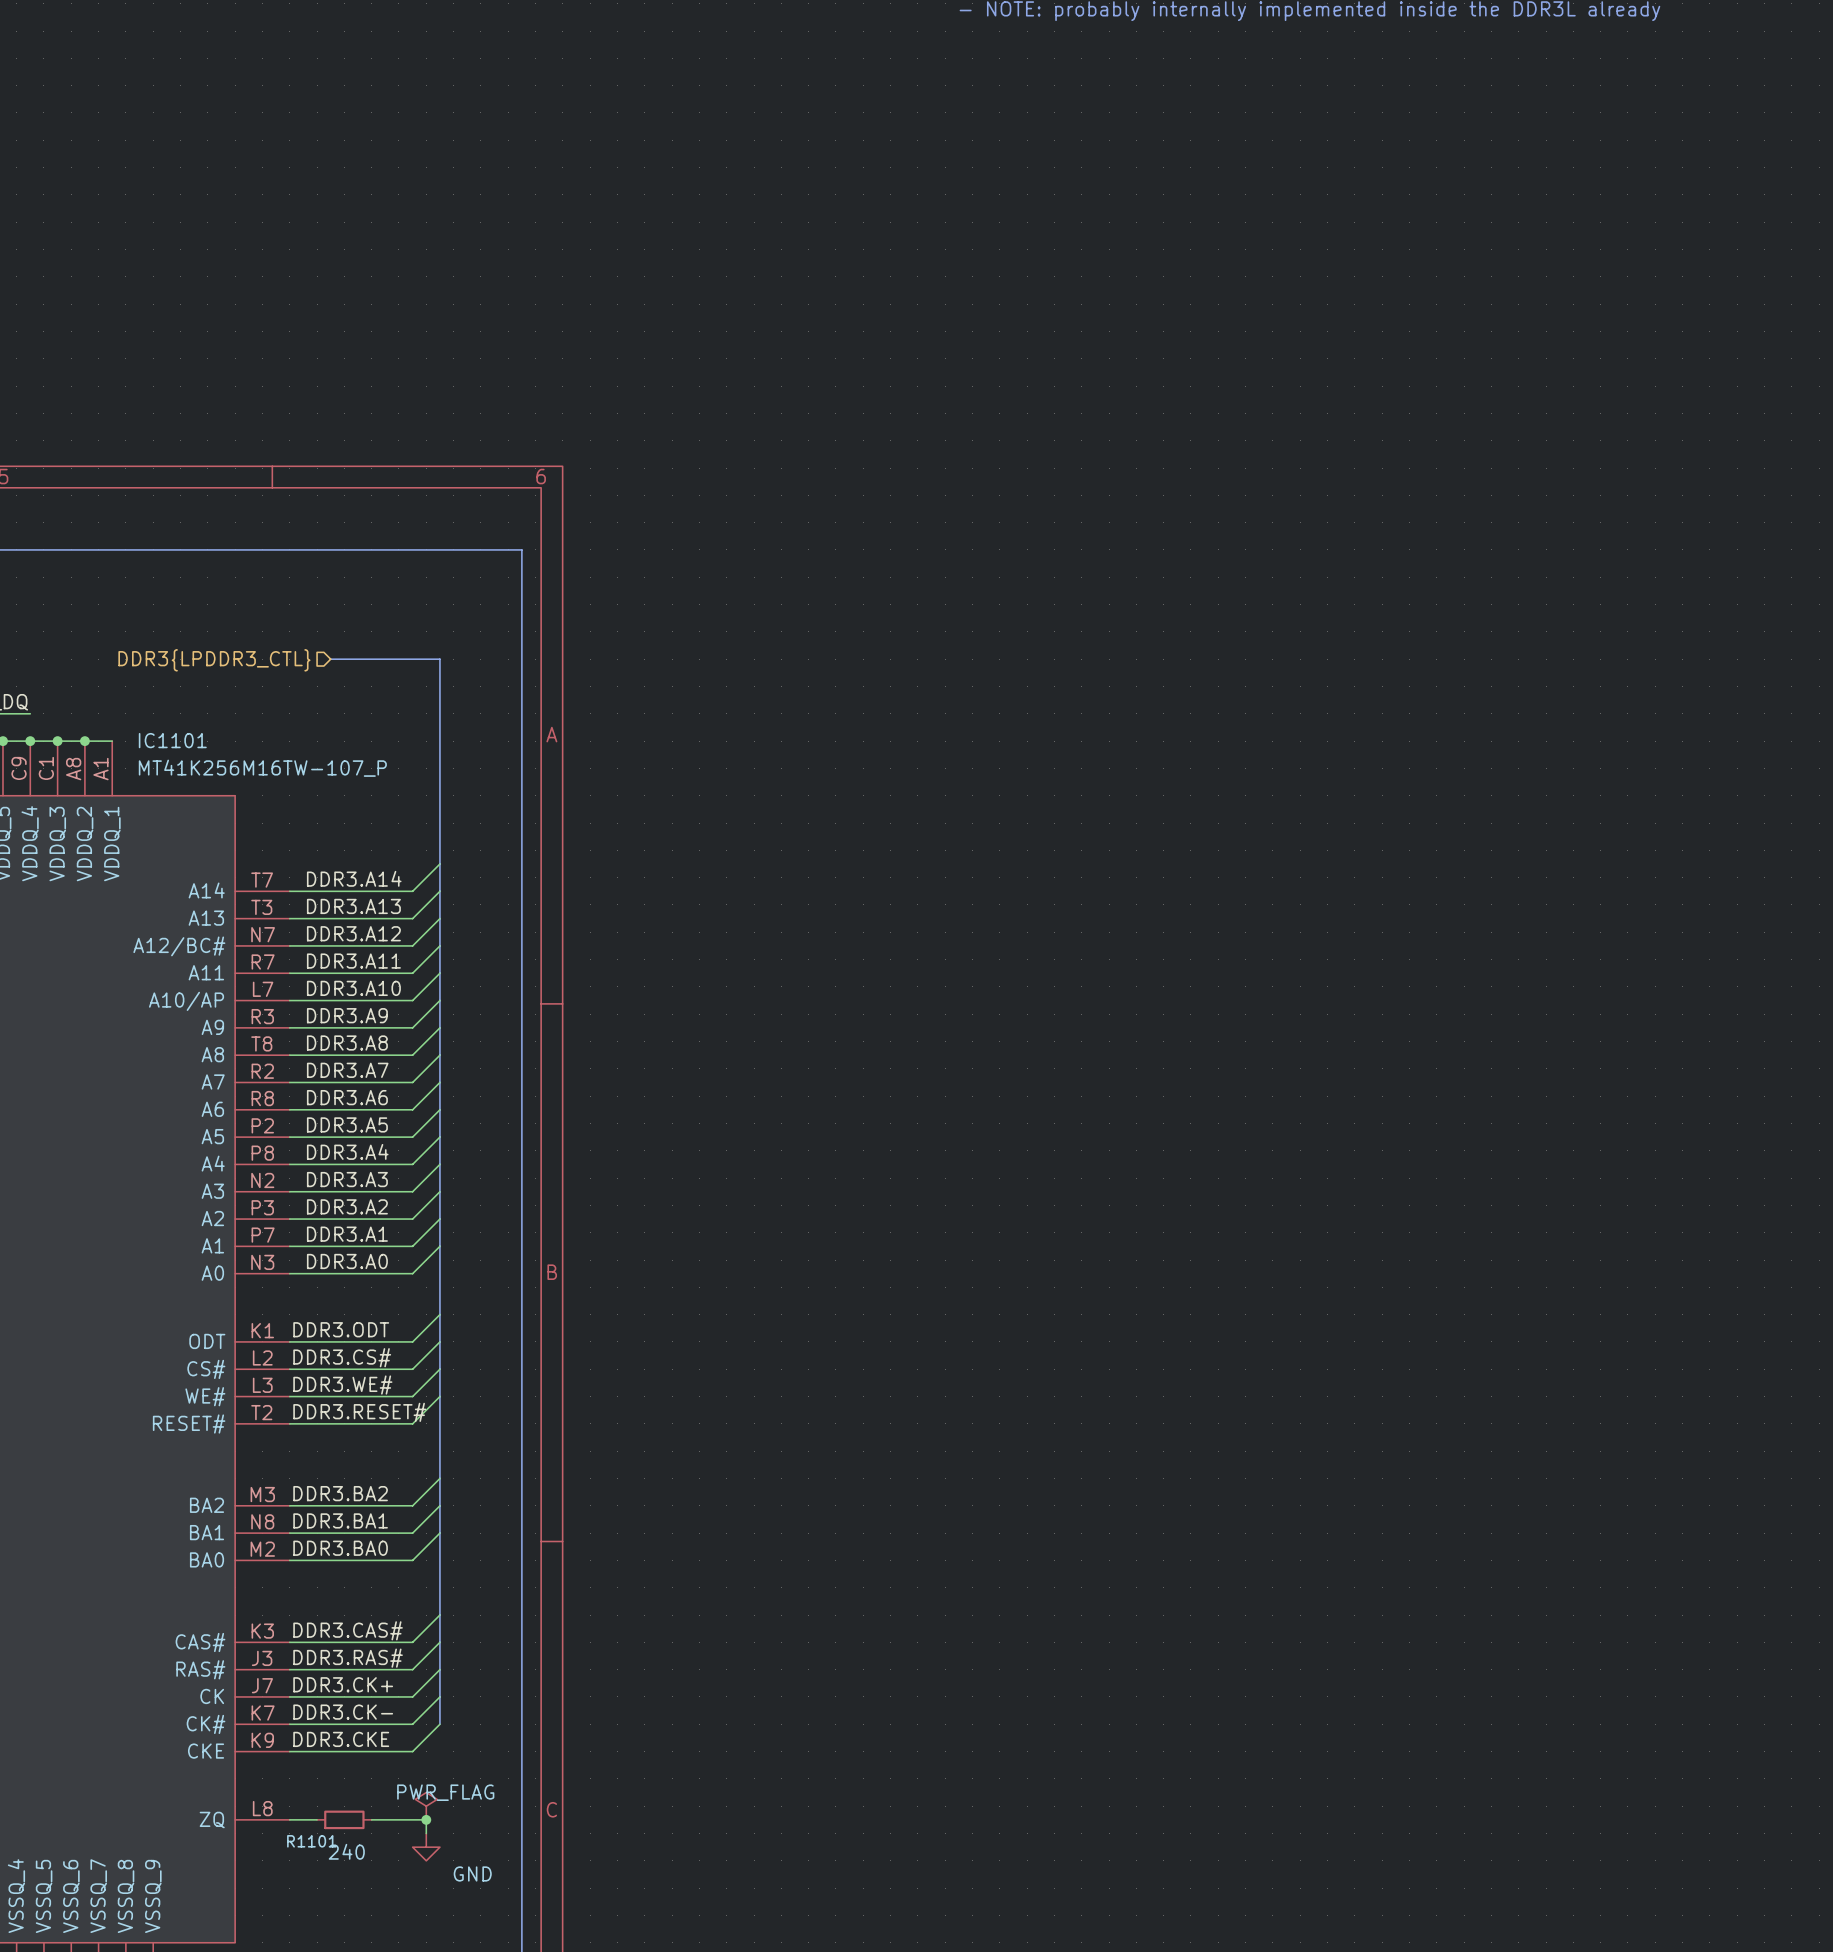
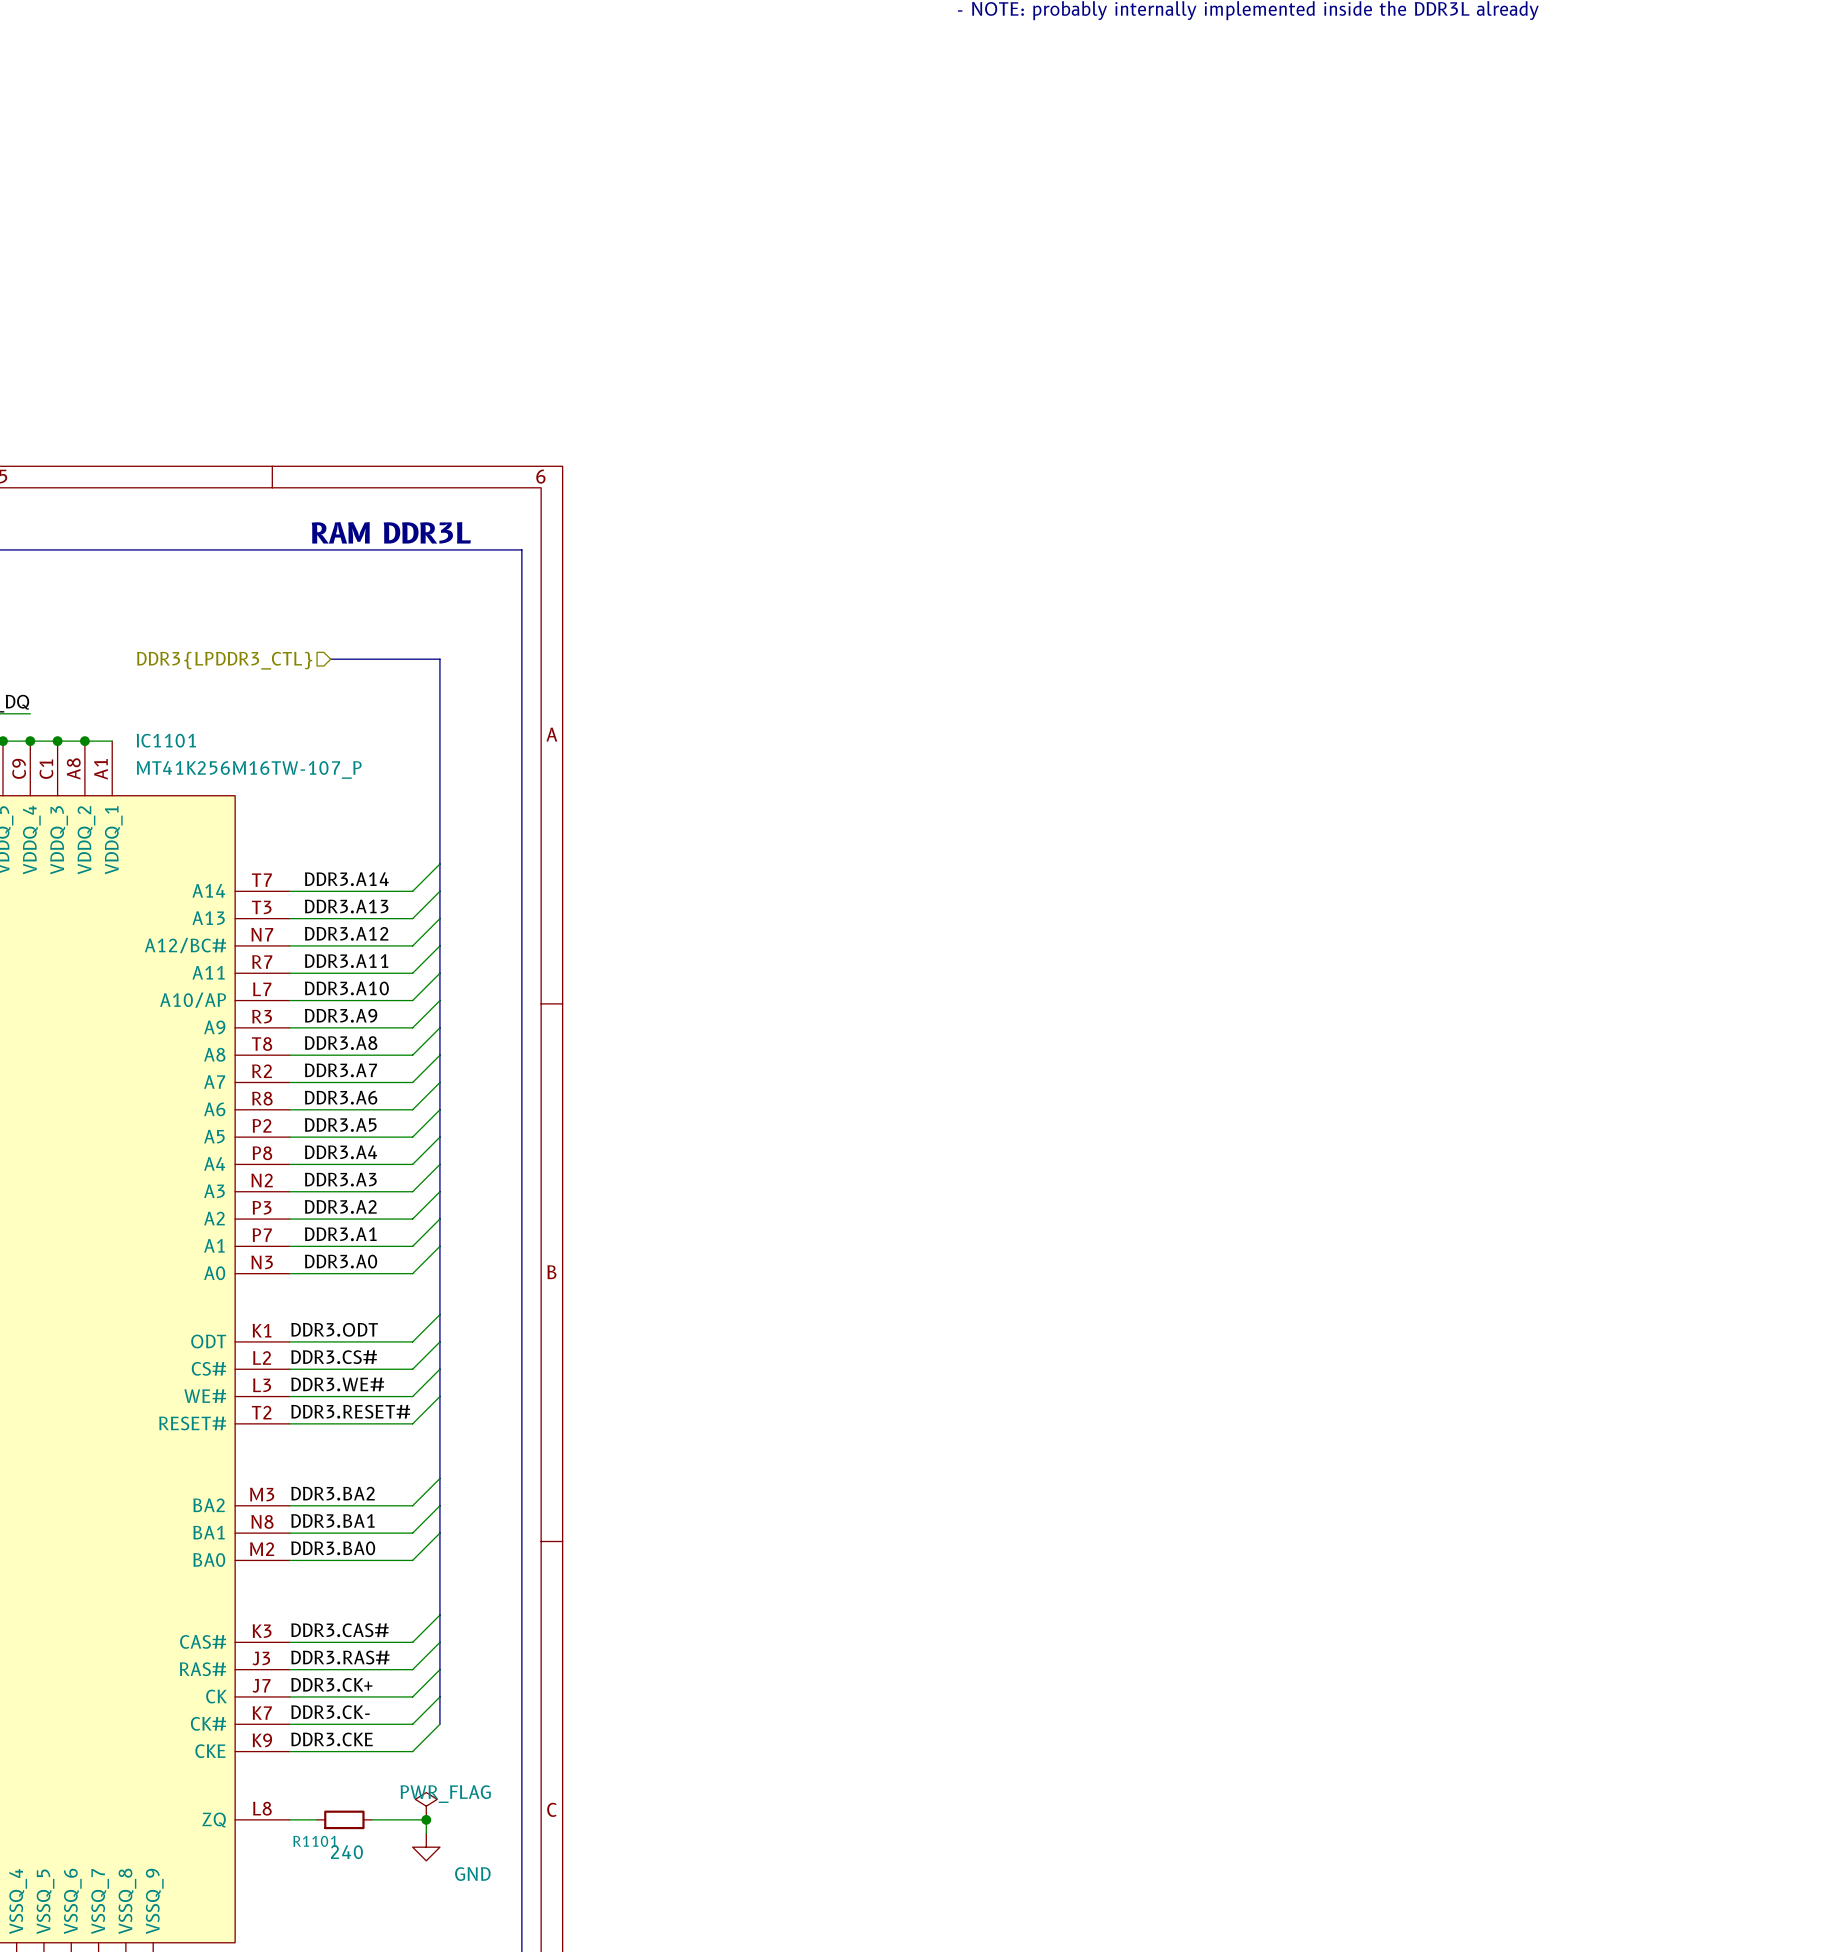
text: none -> RAM DDR3L (391, 532)

